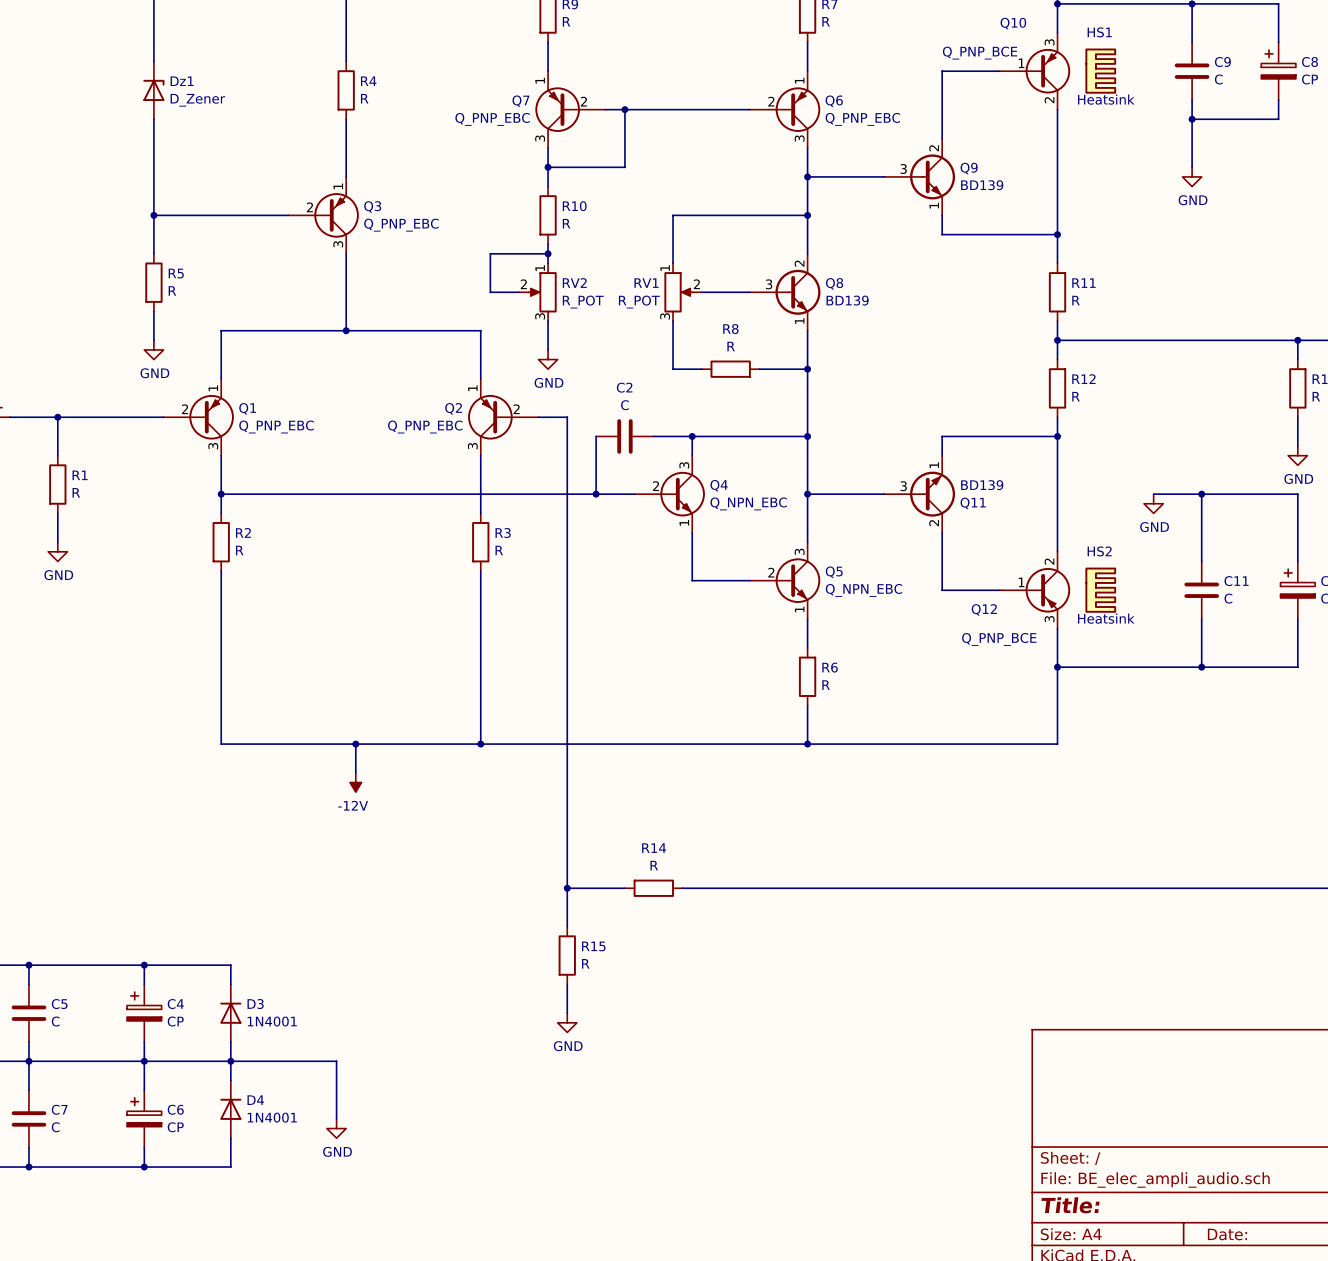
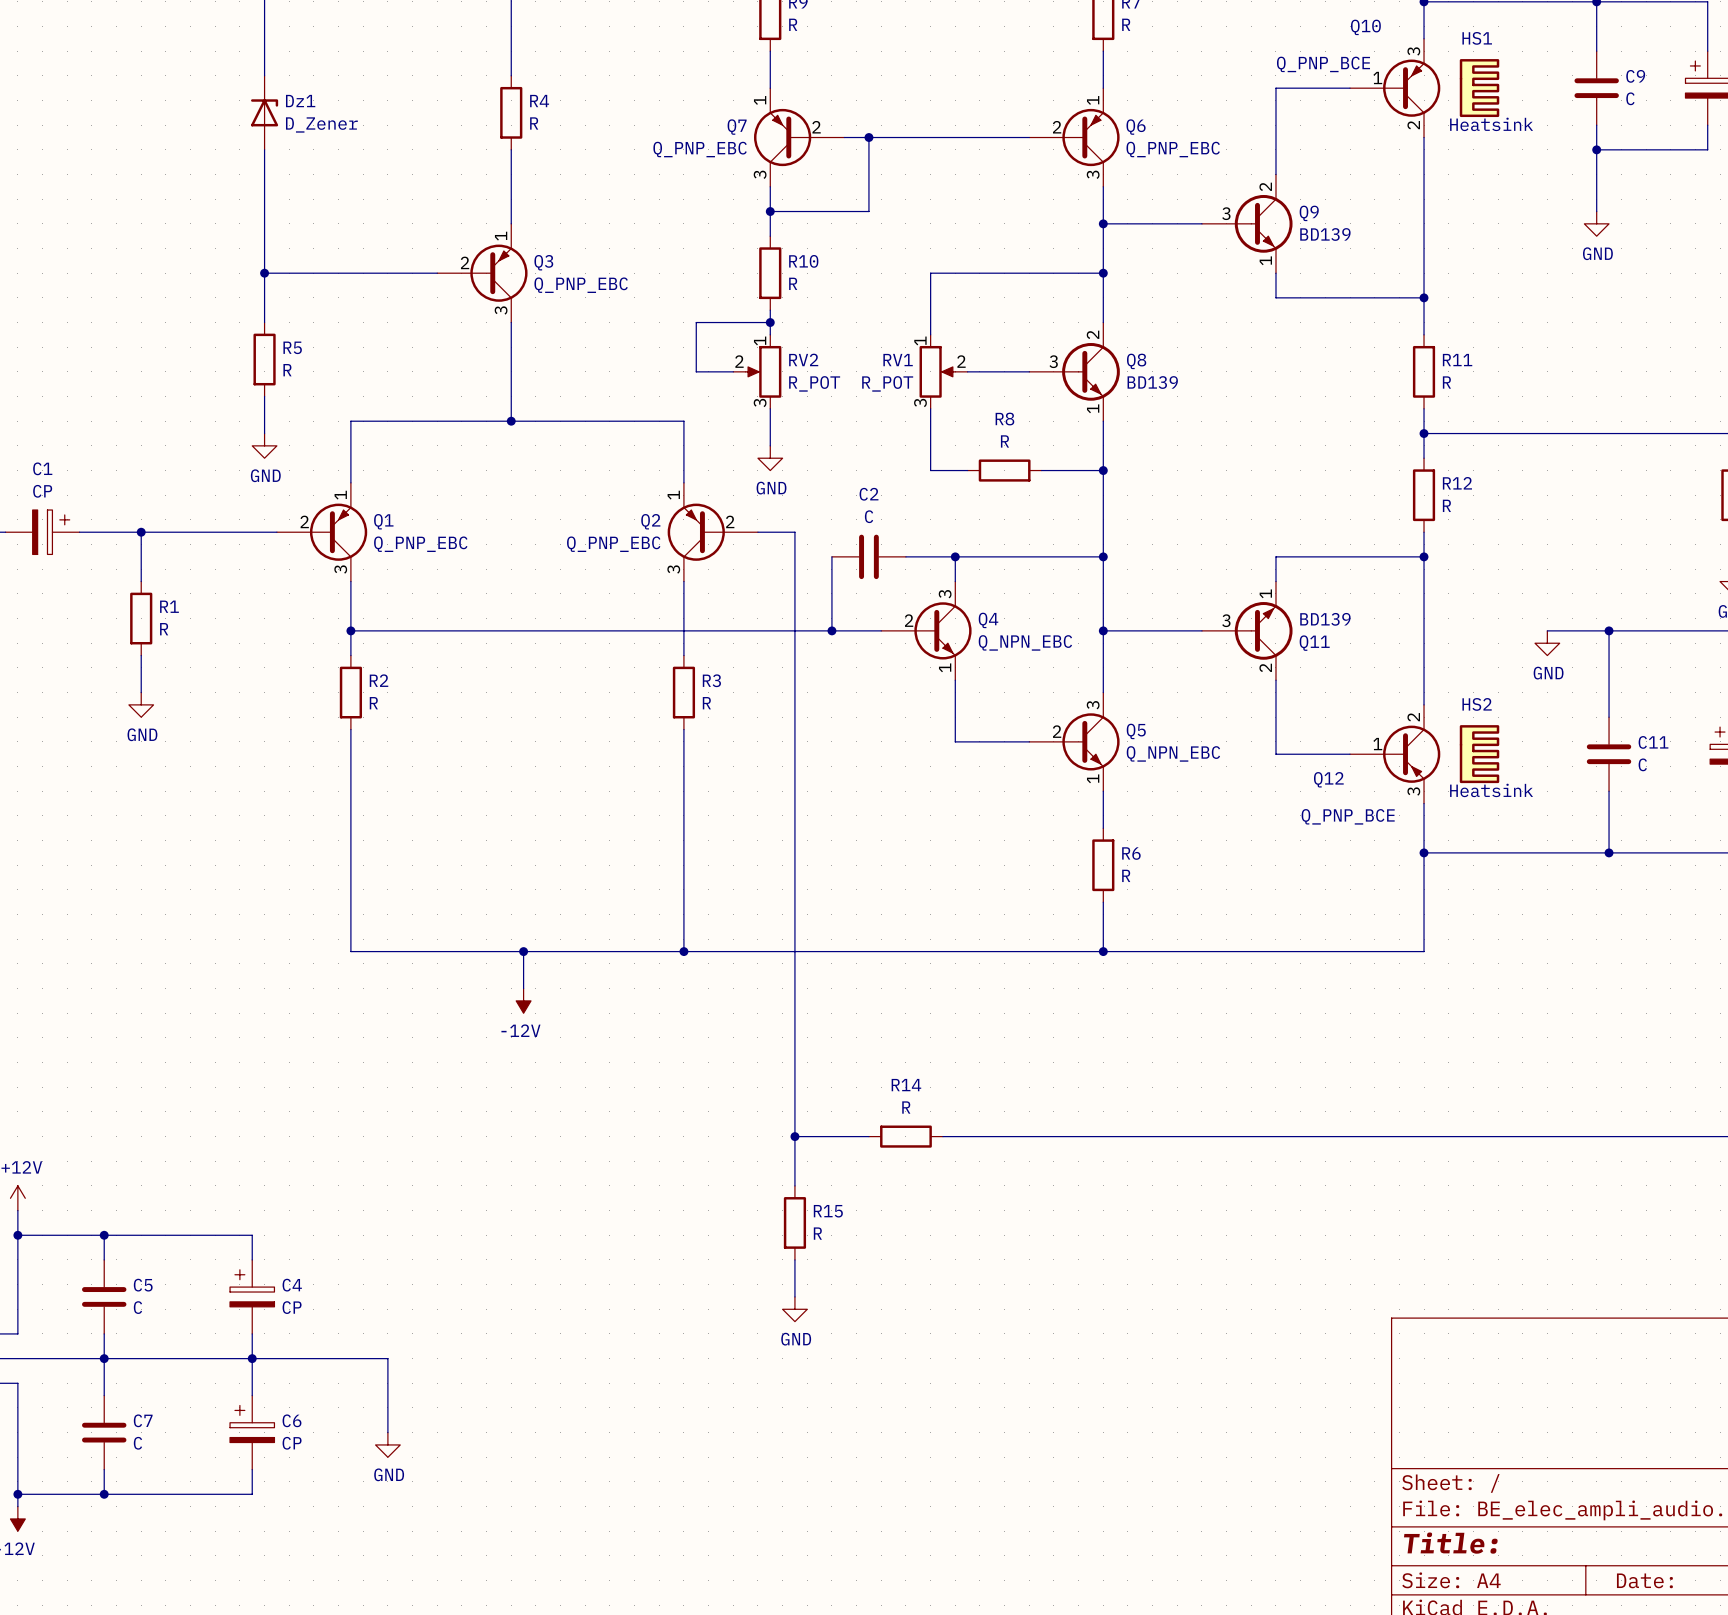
wire: (144, 965) (230, 965) (230, 984) -> none
junction: (144, 965) -> none
D3: 1N4001 (230, 1013) -> none
wire: (230, 1042) (230, 1080) -> none
junction: (230, 1061) -> none
wire: (250, 1061) (336, 1061) (336, 1118) -> (387, 1358) (387, 1432)
D4: 1N4001 (230, 1109) -> none
power symbol position: GND (336, 1128) -> GND (387, 1444)
wire: (230, 1138) (230, 1167) (144, 1167) -> none
junction: (144, 1167) -> none

